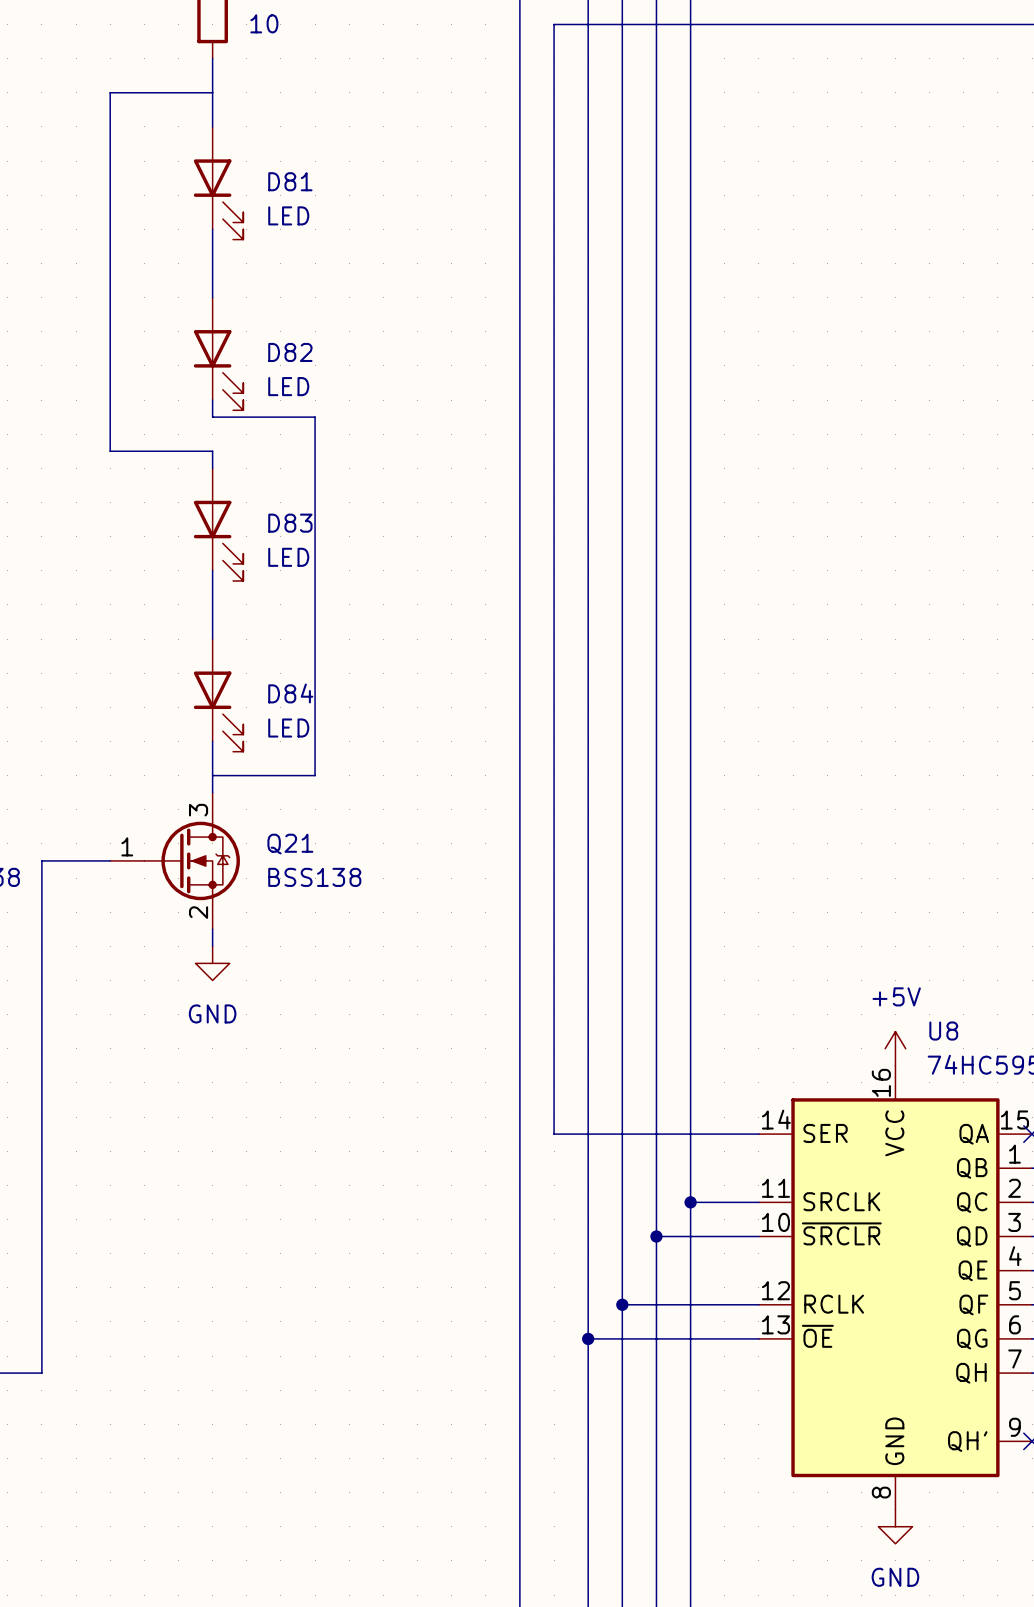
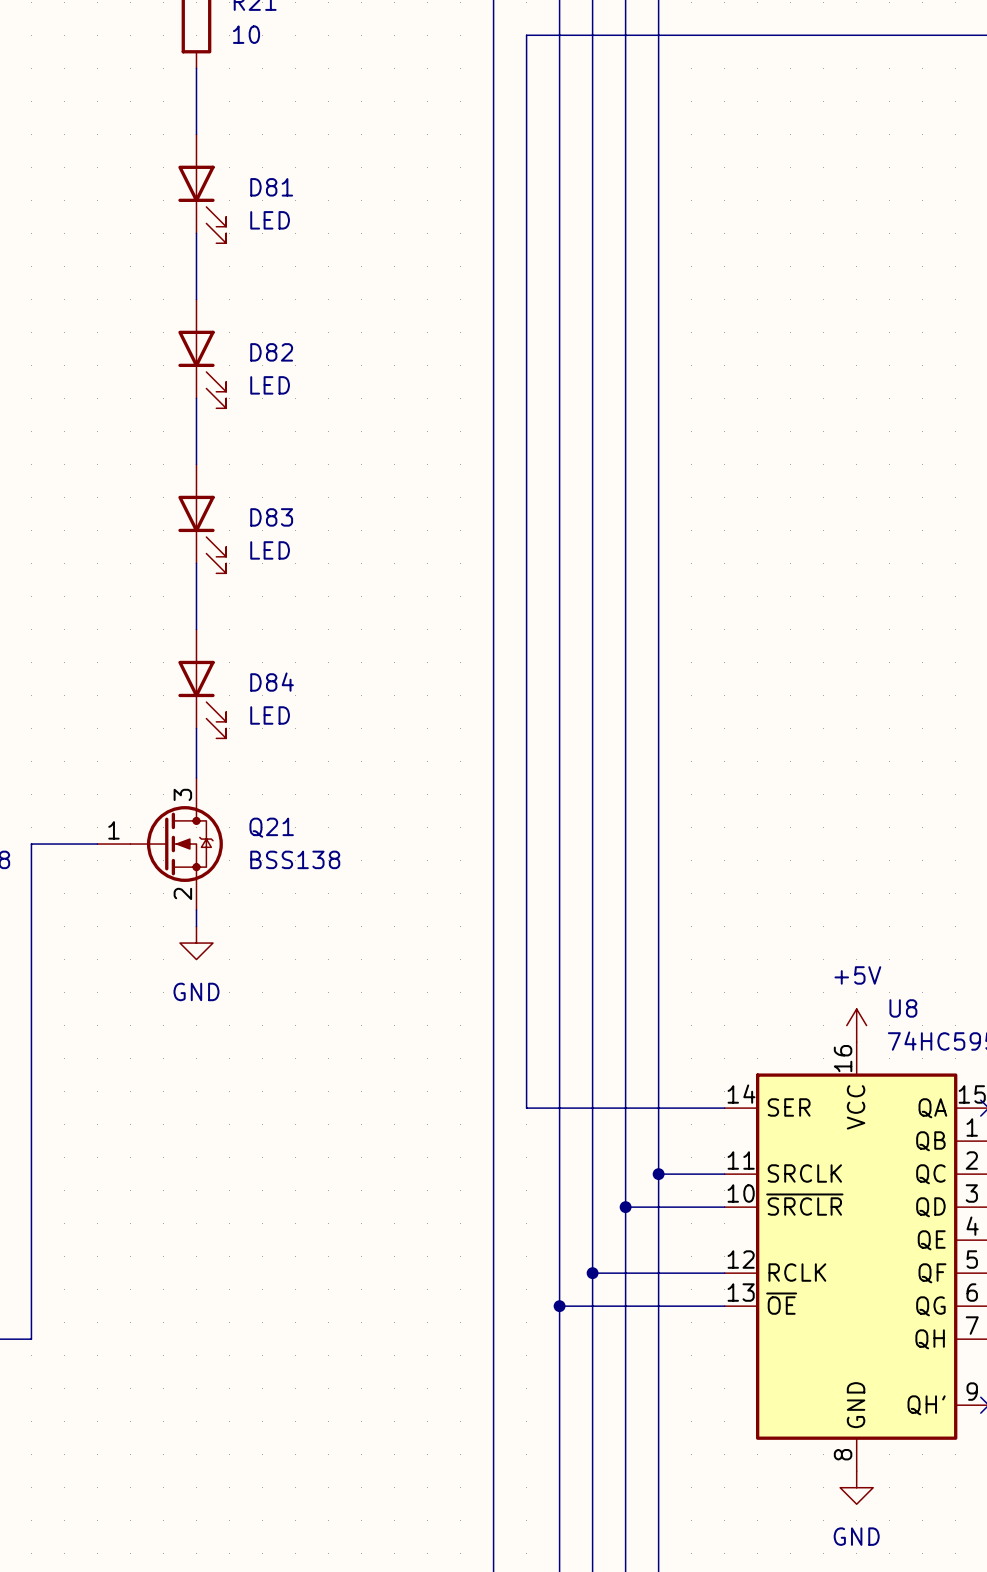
wire: (212, 92) (110, 92) (110, 451) (212, 451) -> (196, 414) (196, 447)
wire: (212, 417) (315, 417) (315, 775) (212, 775) -> none

